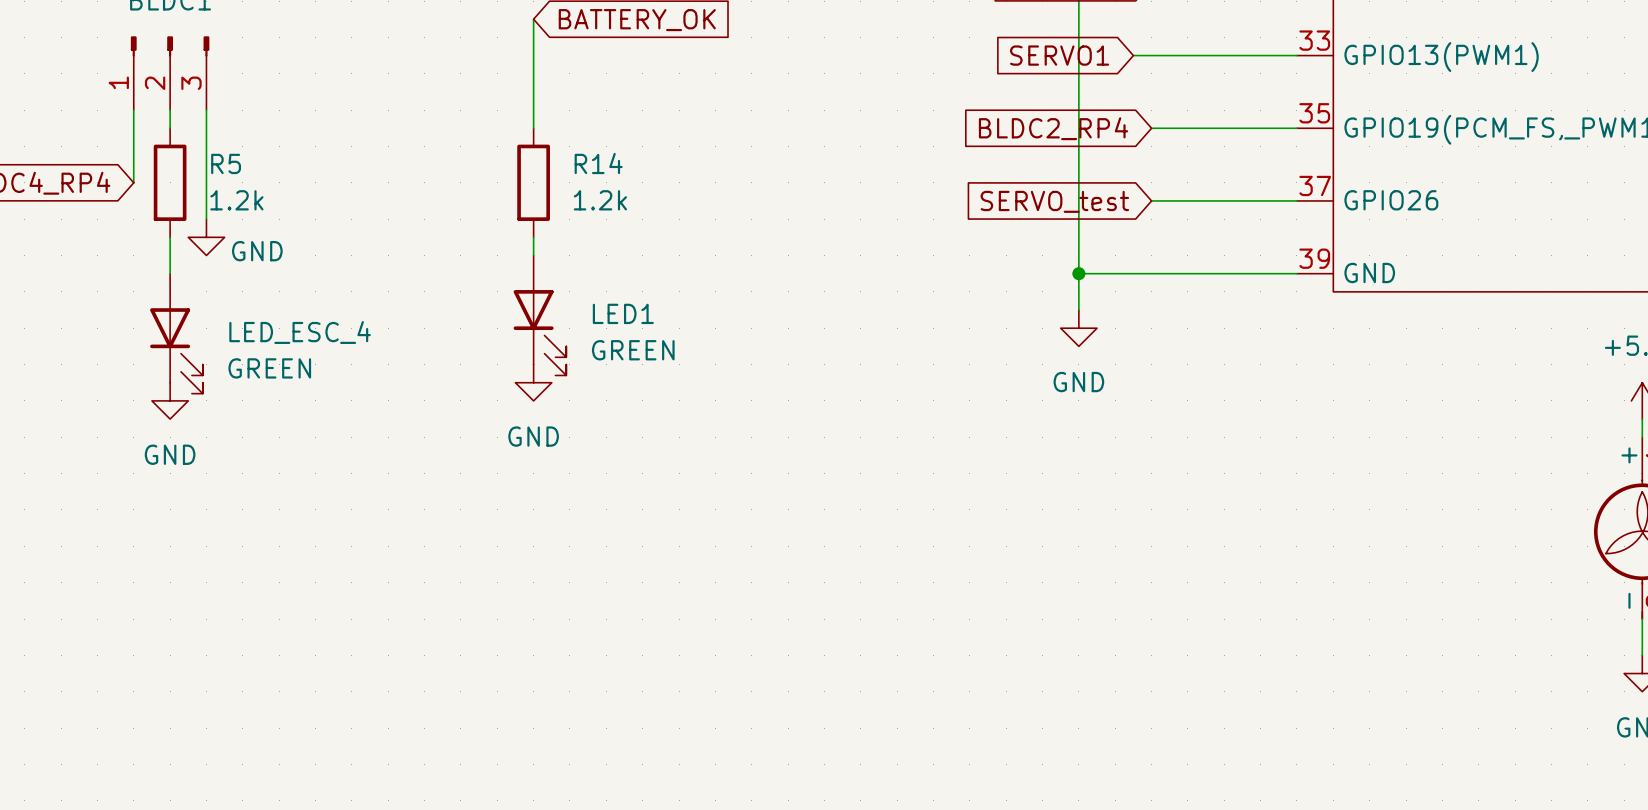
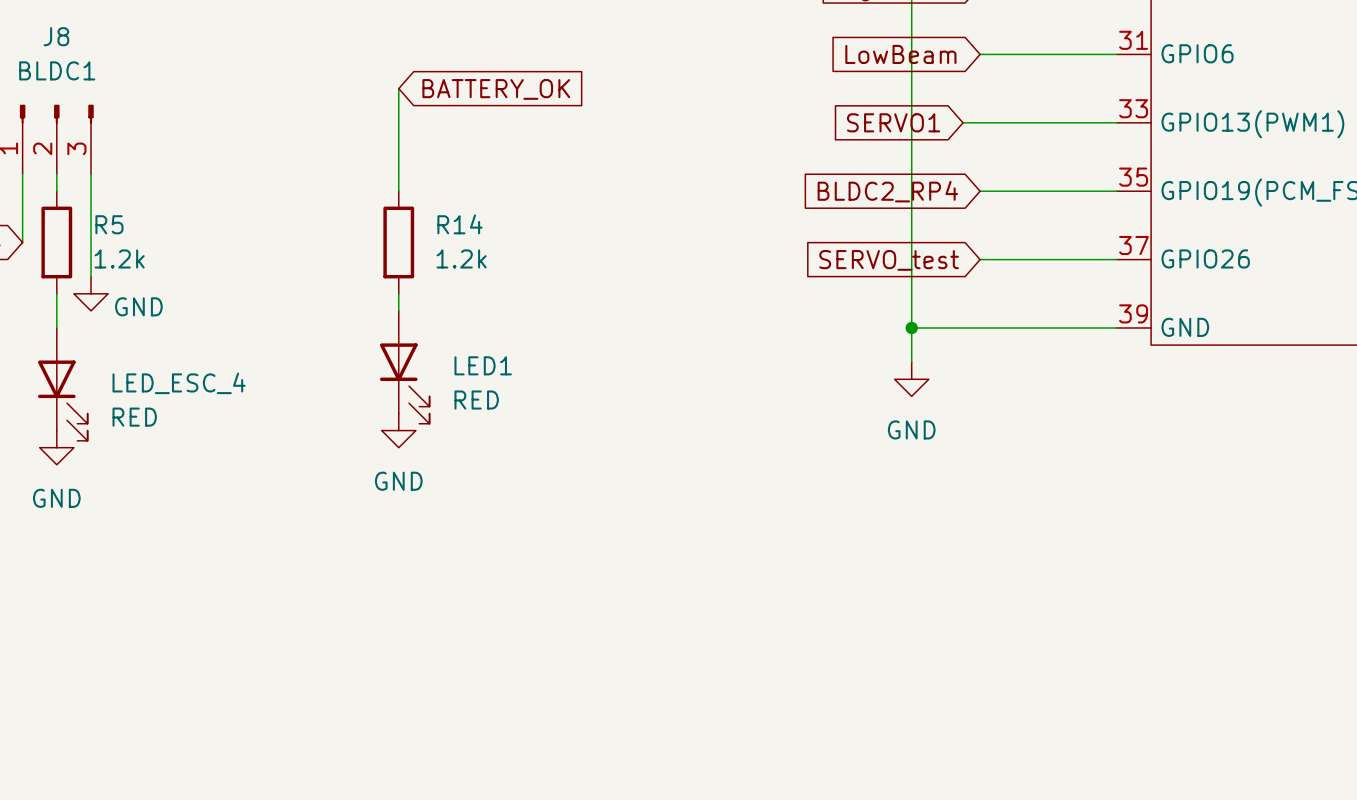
LED1 value: GREEN (633, 350) -> RED (476, 400)
LED_ESC_4 value: GREEN (269, 368) -> RED (134, 417)

